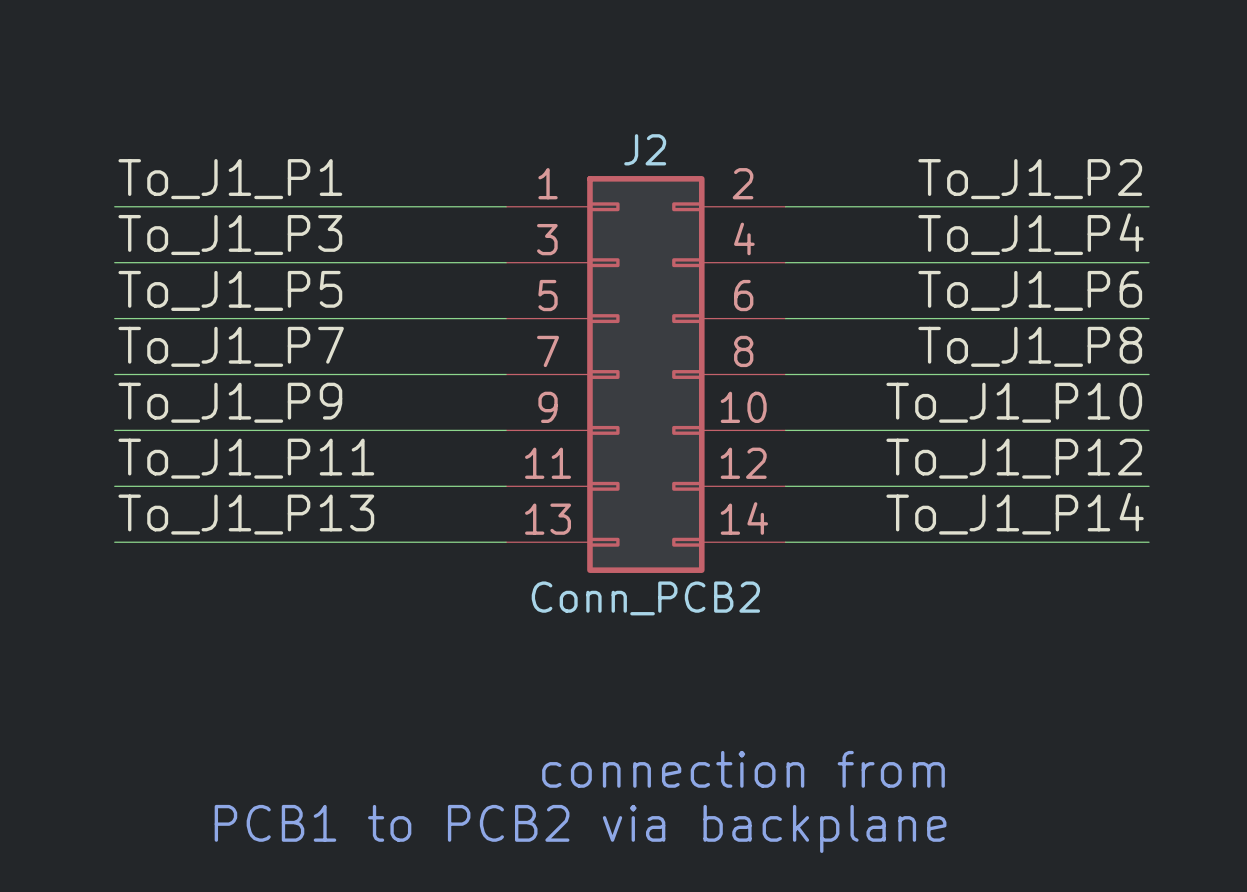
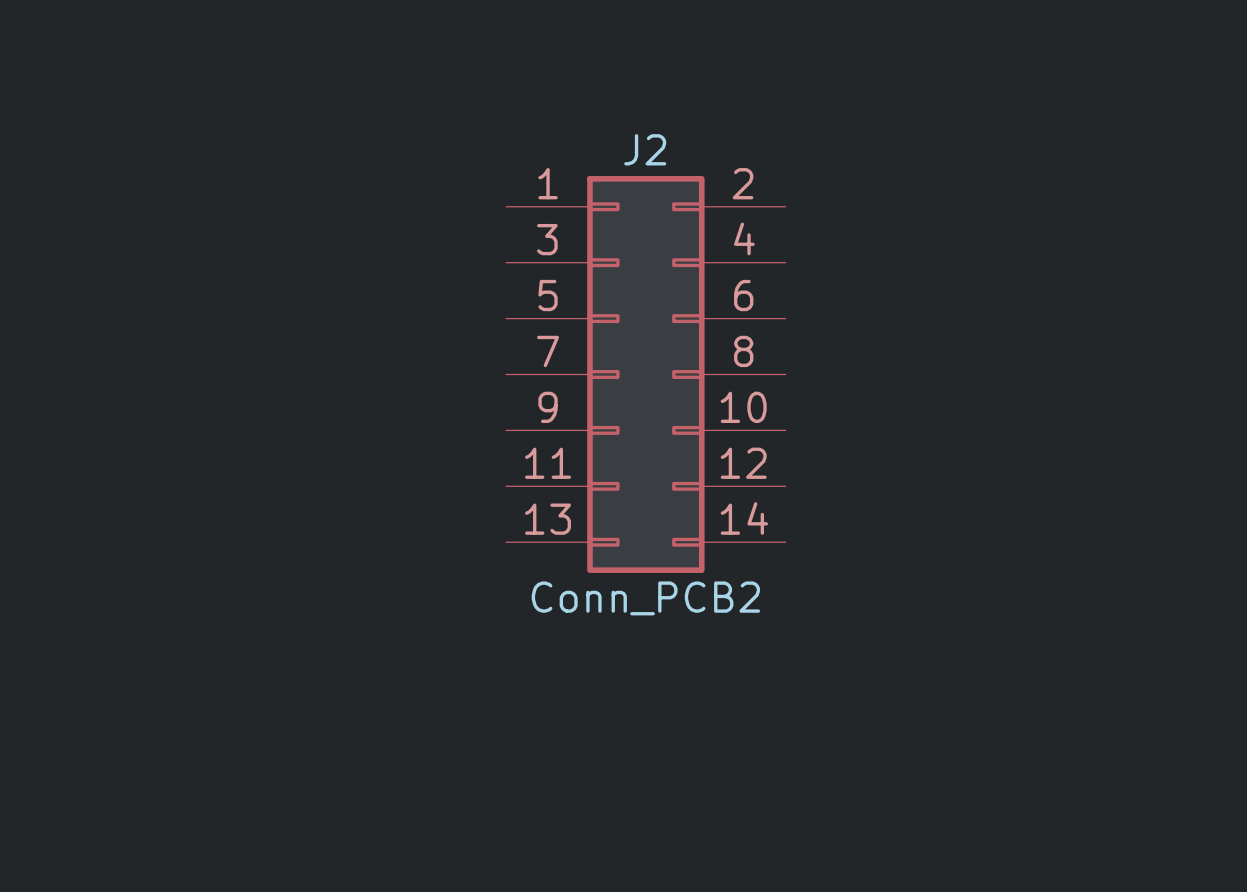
label: To_J1_P1 (230, 179) -> none
label: To_J1_P2 (1030, 179) -> none
wire: (114, 206) (506, 206) -> none
wire: (785, 206) (1149, 206) -> none
label: To_J1_P4 (1031, 234) -> none
label: To_J1_P3 (230, 235) -> none
wire: (114, 262) (506, 262) -> none
wire: (785, 262) (1149, 262) -> none
label: To_J1_P5 (230, 290) -> none
label: To_J1_P6 (1030, 290) -> none
wire: (114, 318) (506, 318) -> none
wire: (785, 318) (1149, 318) -> none
label: To_J1_P7 (231, 346) -> none
label: To_J1_P8 (1030, 346) -> none
wire: (114, 374) (506, 374) -> none
wire: (785, 374) (1149, 374) -> none
label: To_J1_P9 (230, 402) -> none
label: To_J1_P10 (1014, 402) -> none
wire: (114, 430) (506, 430) -> none
wire: (785, 430) (1149, 430) -> none
label: To_J1_P11 (246, 458) -> none
label: To_J1_P12 (1014, 458) -> none
wire: (114, 486) (506, 486) -> none
wire: (785, 486) (1149, 486) -> none
label: To_J1_P14 (1015, 513) -> none
label: To_J1_P13 (246, 514) -> none
wire: (114, 542) (506, 542) -> none
wire: (785, 542) (1149, 542) -> none
text: connection from (743, 769) -> none
text: PCB1 to PCB2 via backplane (580, 828) -> none

